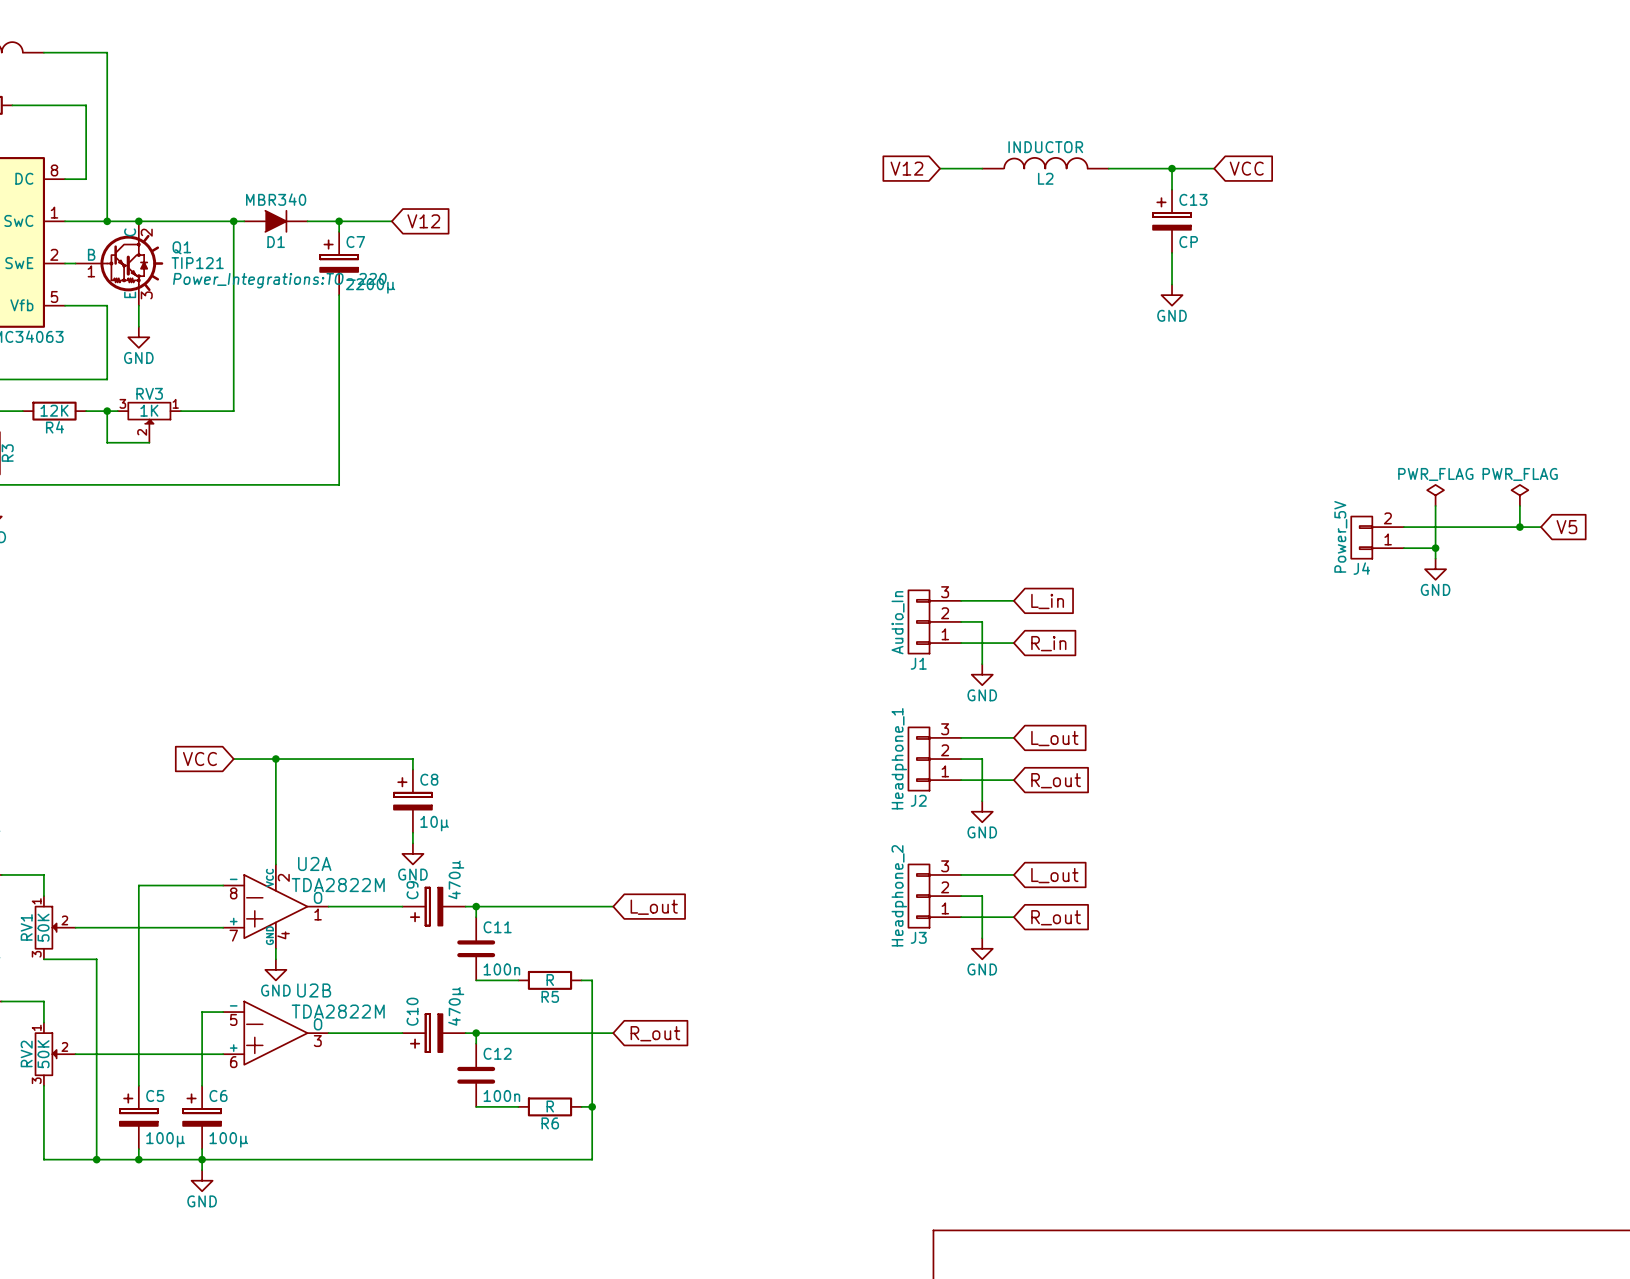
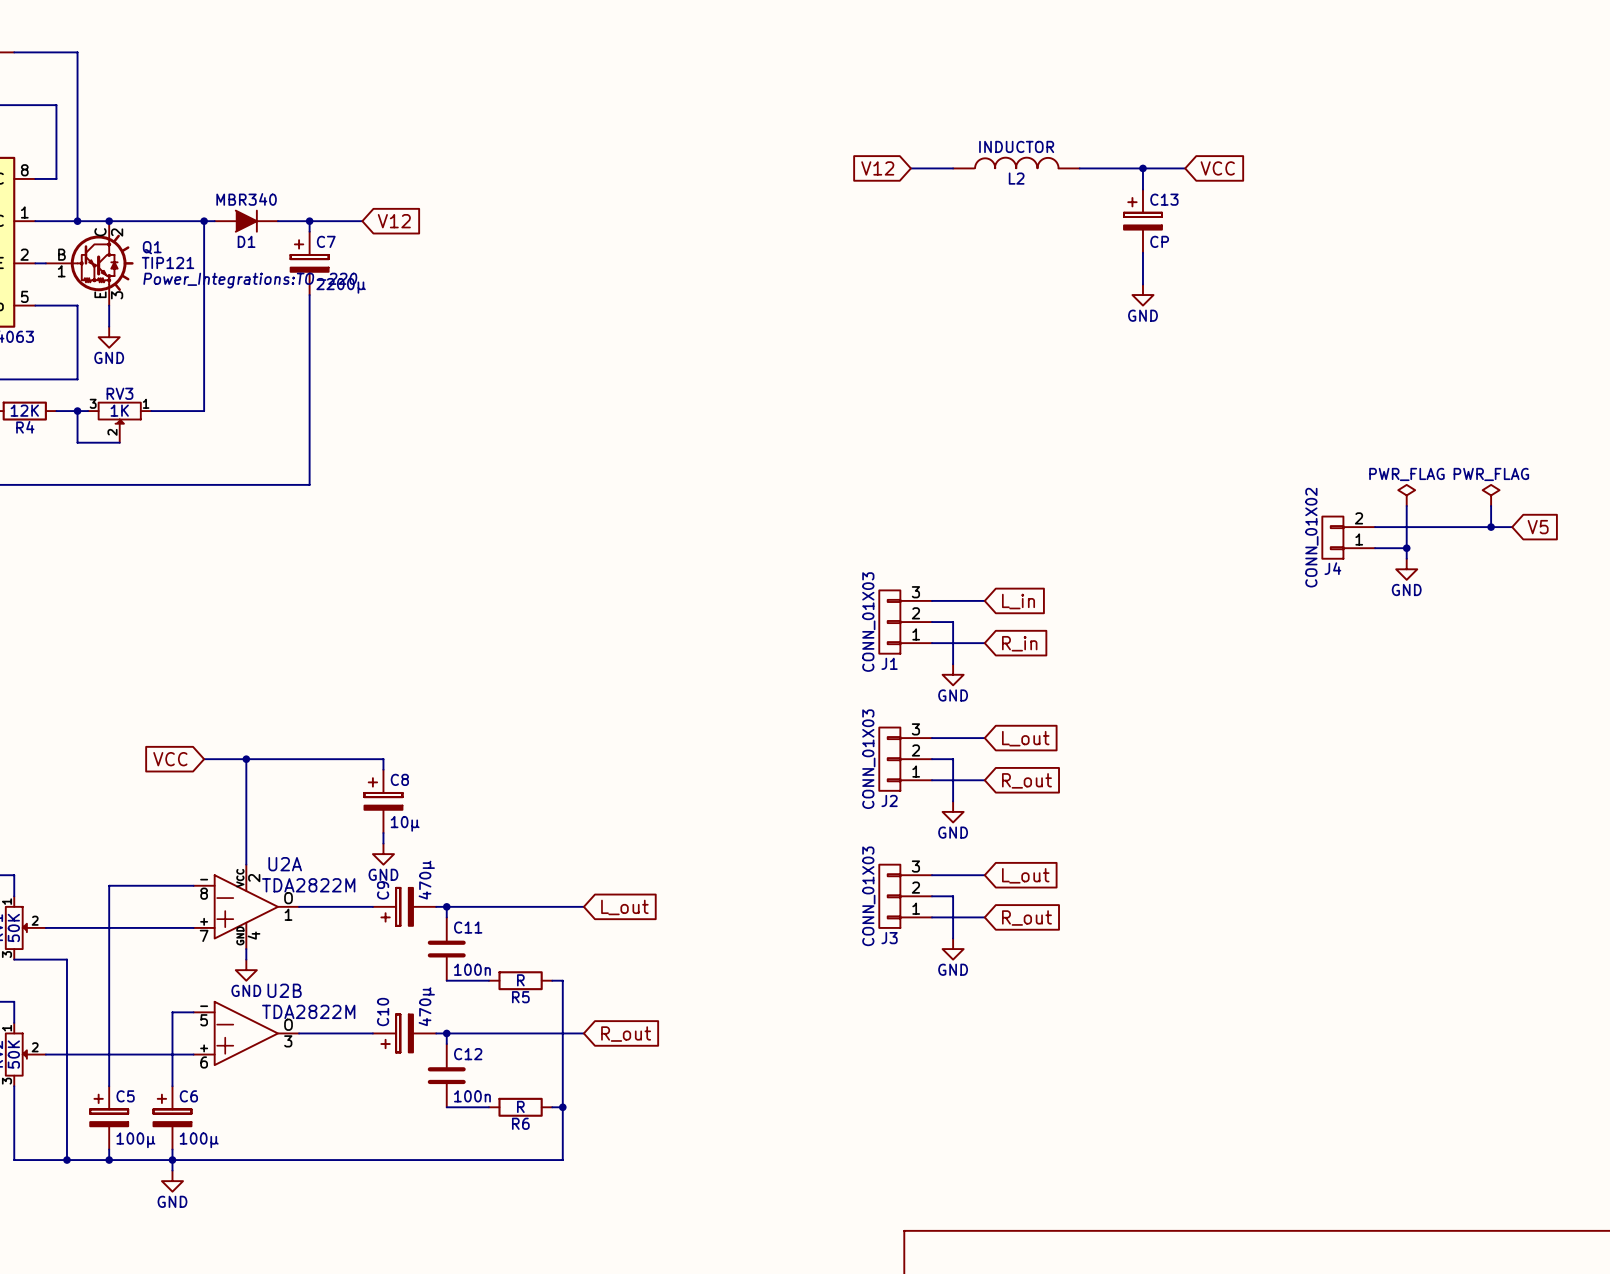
J4 value: Power_5V (1340, 536) -> CONN_01X02 (1311, 537)
J1 value: Audio_In (898, 622) -> CONN_01X03 (868, 622)
J2 value: Headphone_1 (899, 758) -> CONN_01X03 (868, 759)
J3 value: Headphone_2 (899, 895) -> CONN_01X03 (868, 896)

